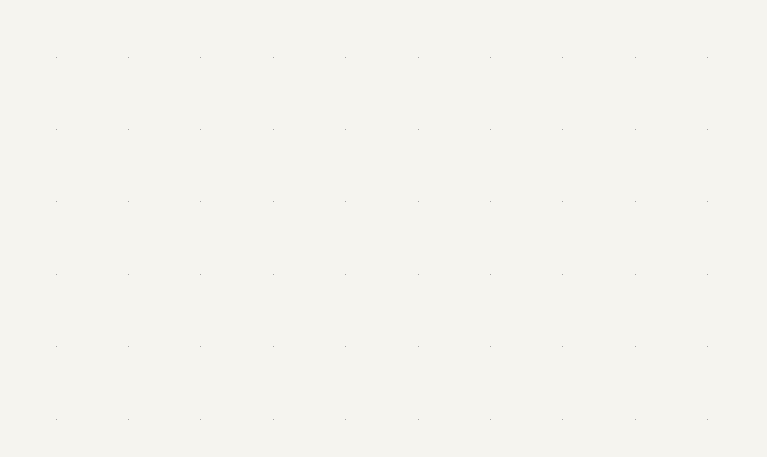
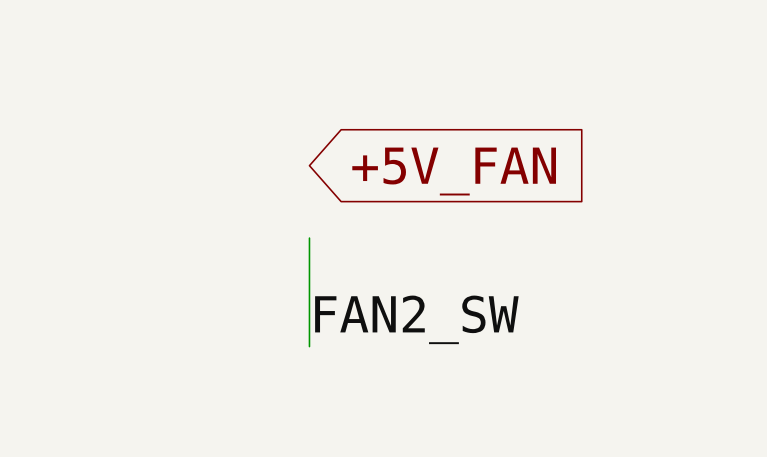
global label: none -> +5V_FAN (454, 171)
wire: none -> (309, 238) (309, 346)
label: none -> FAN2_SW (416, 319)

